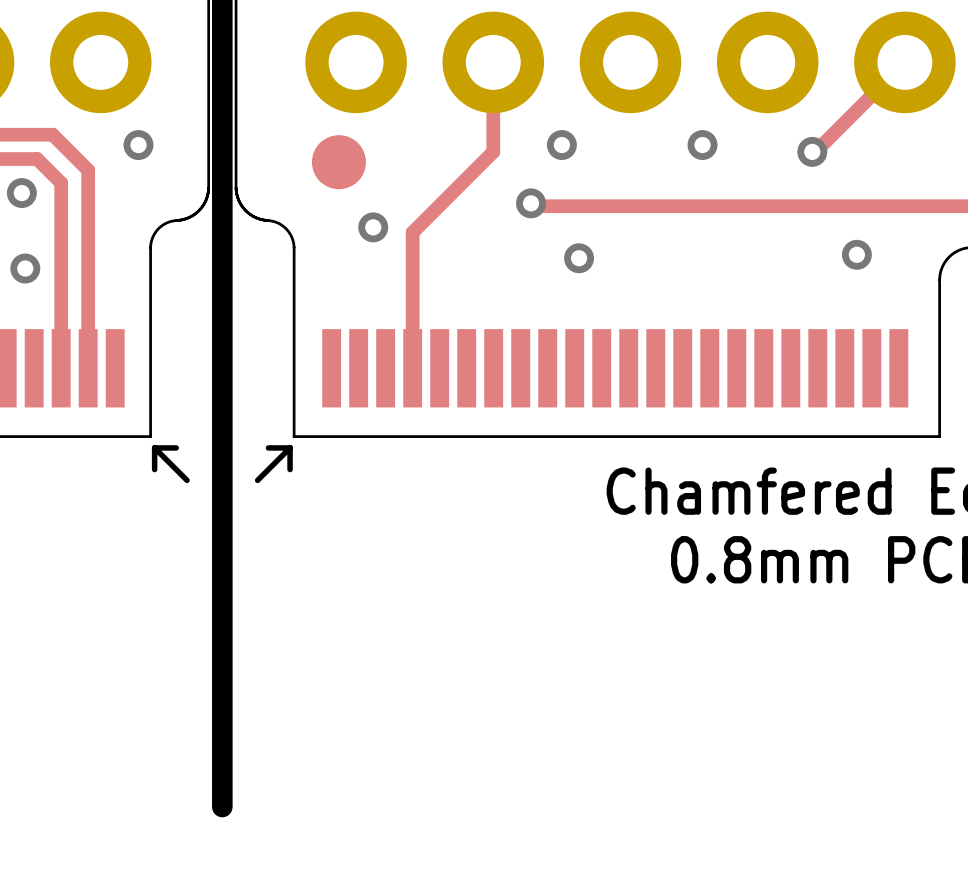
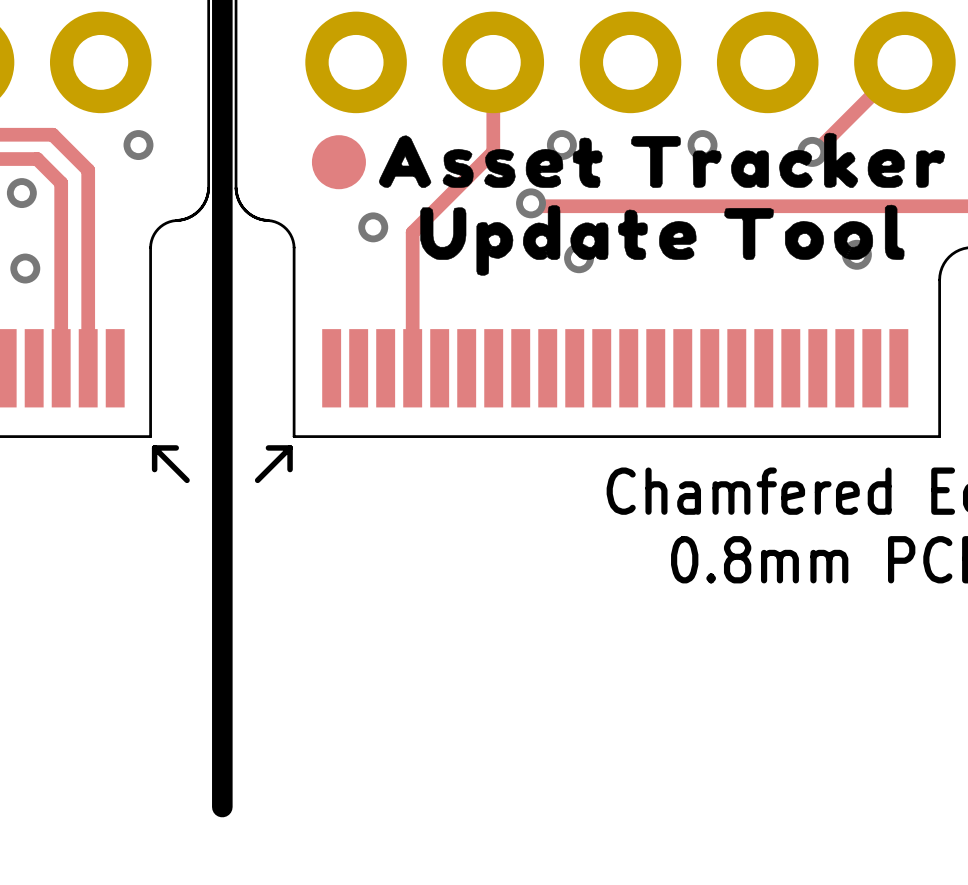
drawing: none -> [378, 132, 946, 276]

